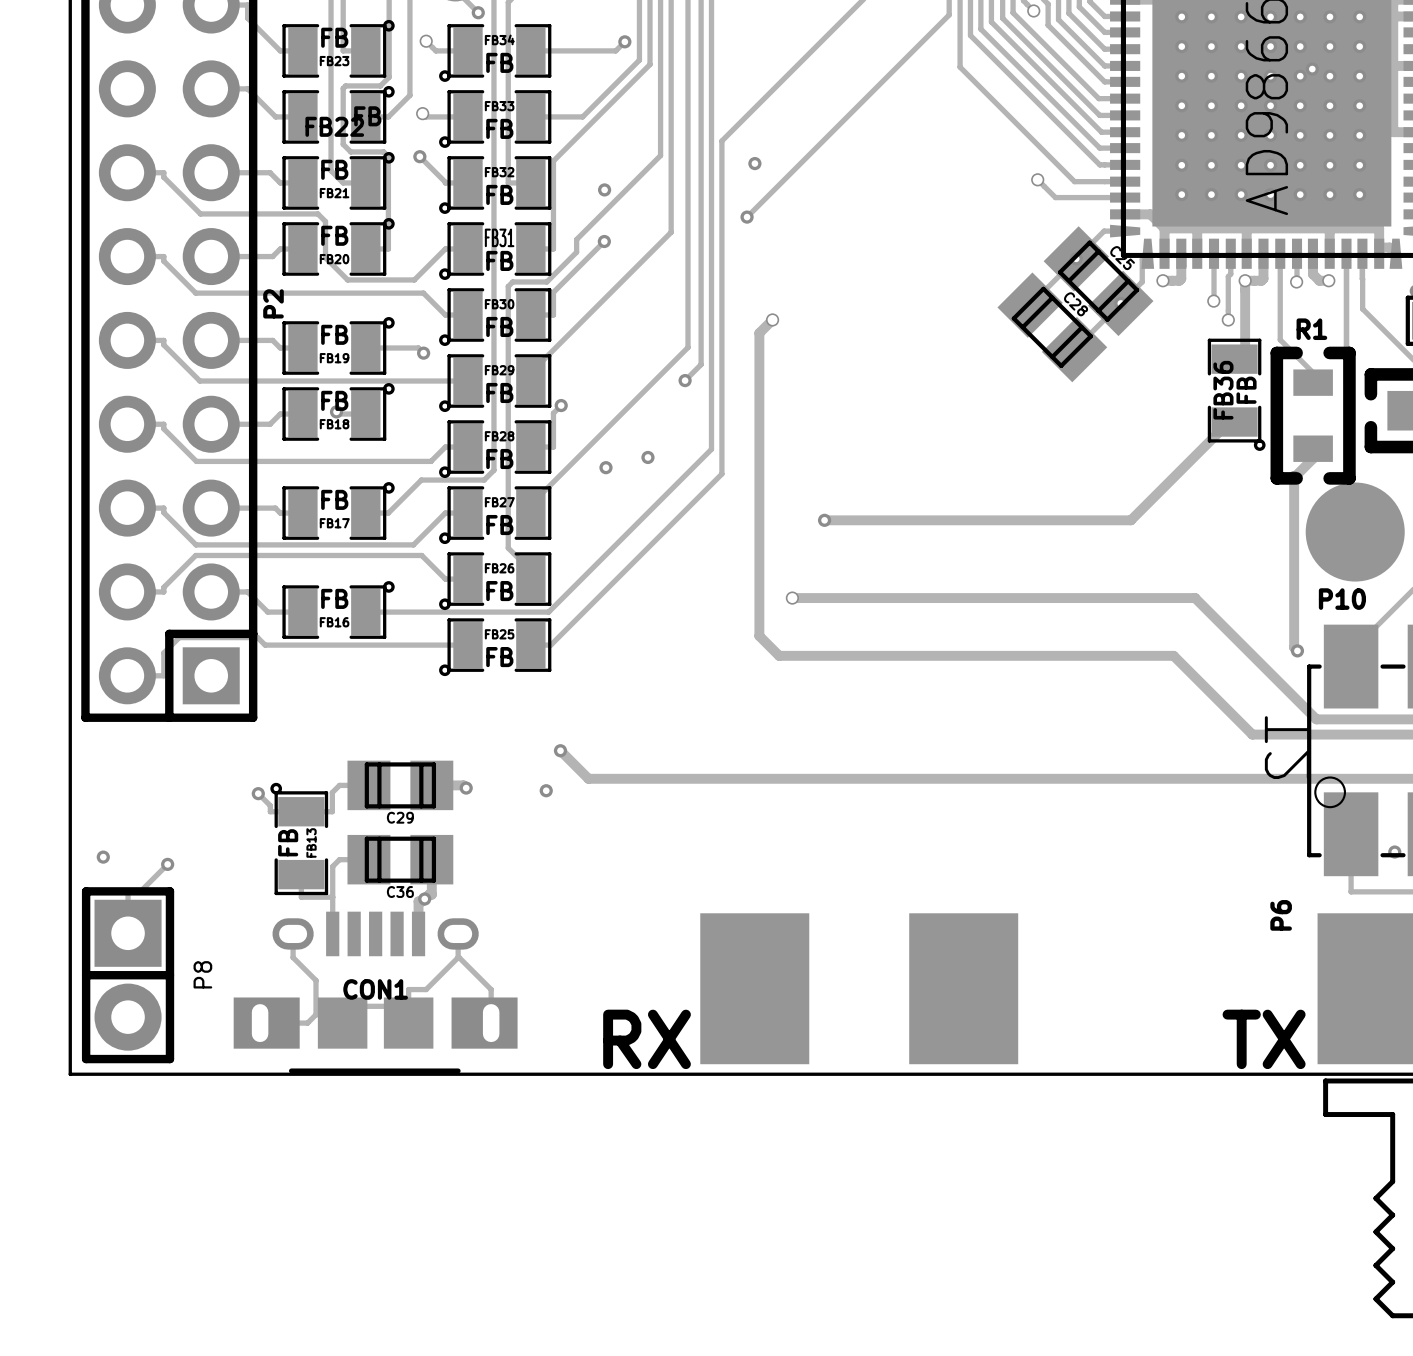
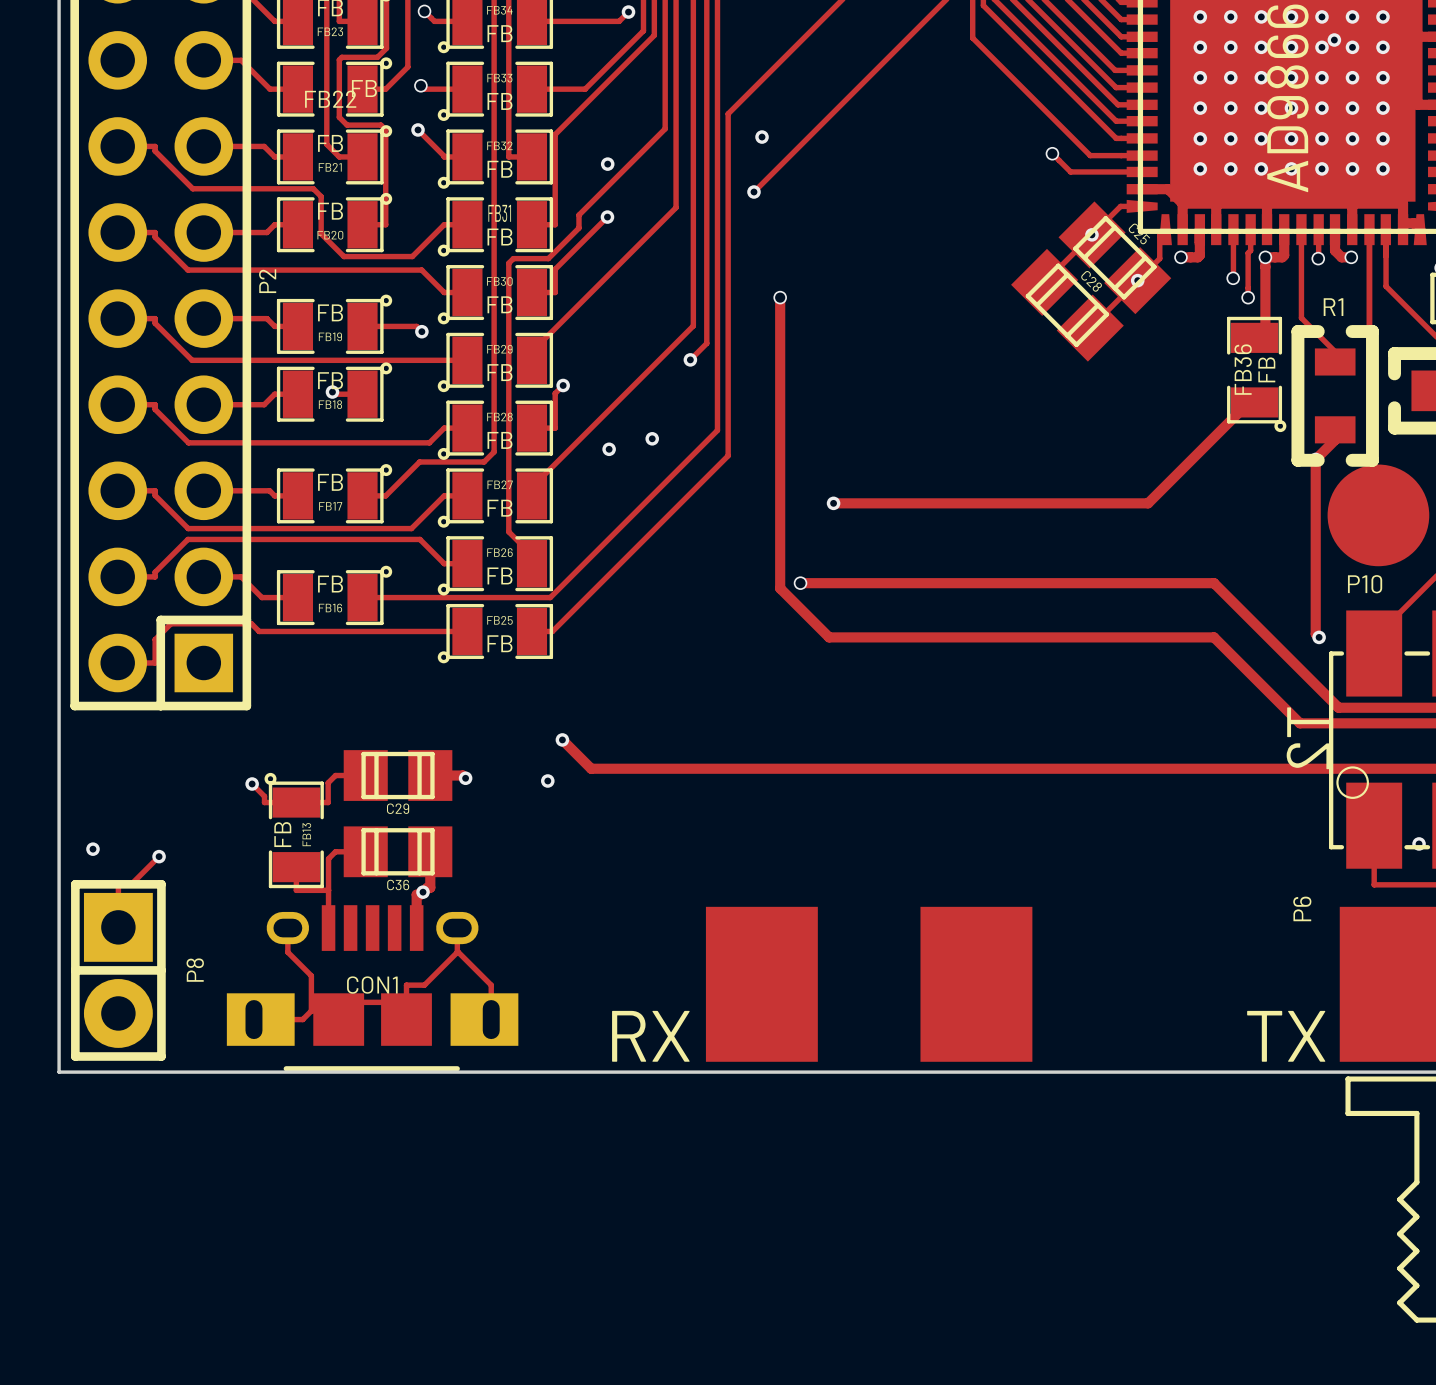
track: (772, 319) (759, 333) (759, 636) (779, 655) (1173, 655) (1252, 734) (1278, 734) -> (780, 297) (780, 588) (829, 637) (1214, 637) (1299, 723)

